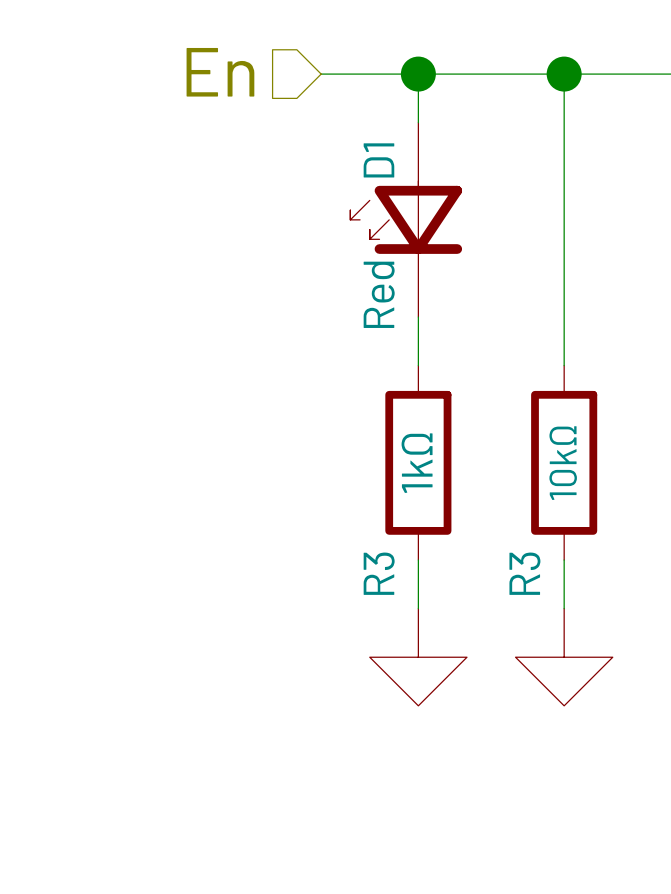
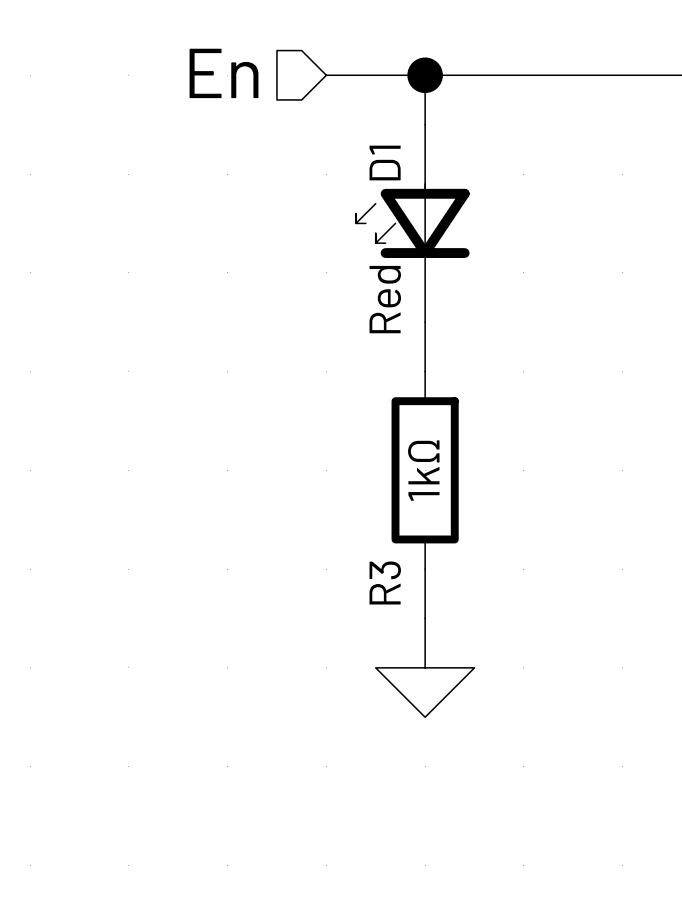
wire: (564, 74) (564, 365) -> none
junction: (564, 74) -> none
R3: 10kΩ (564, 462) -> none
wire: (564, 560) (564, 608) -> none
power symbol: (564, 657) -> none

